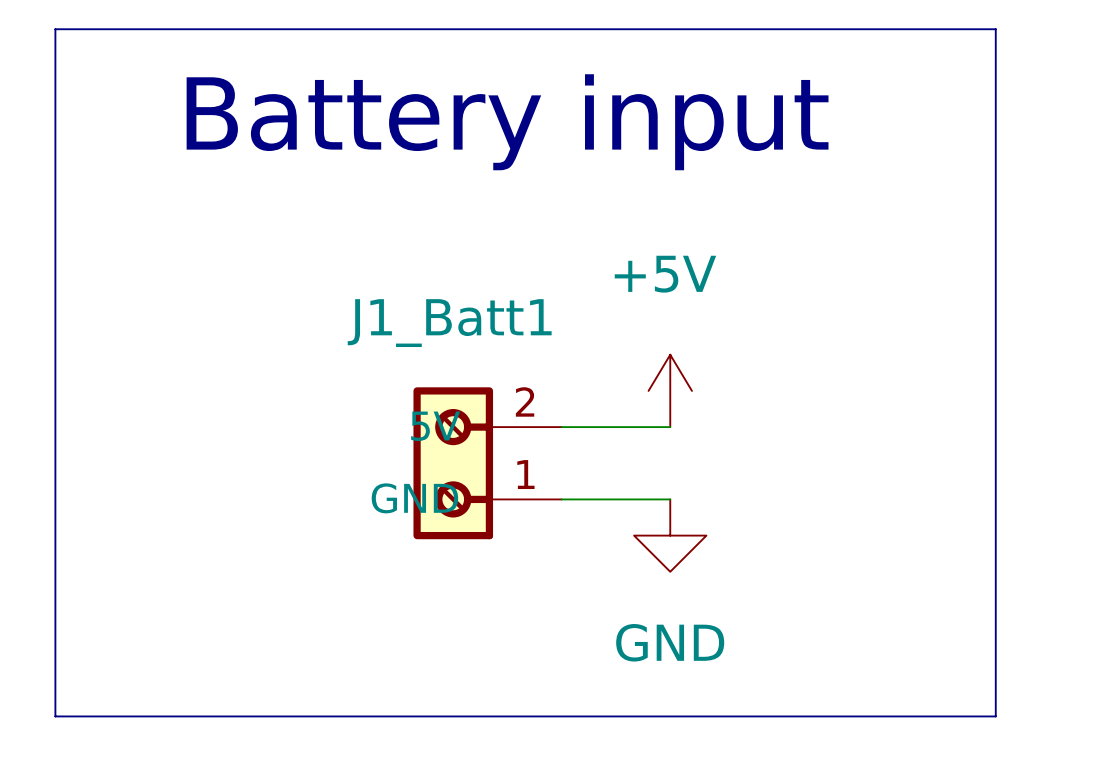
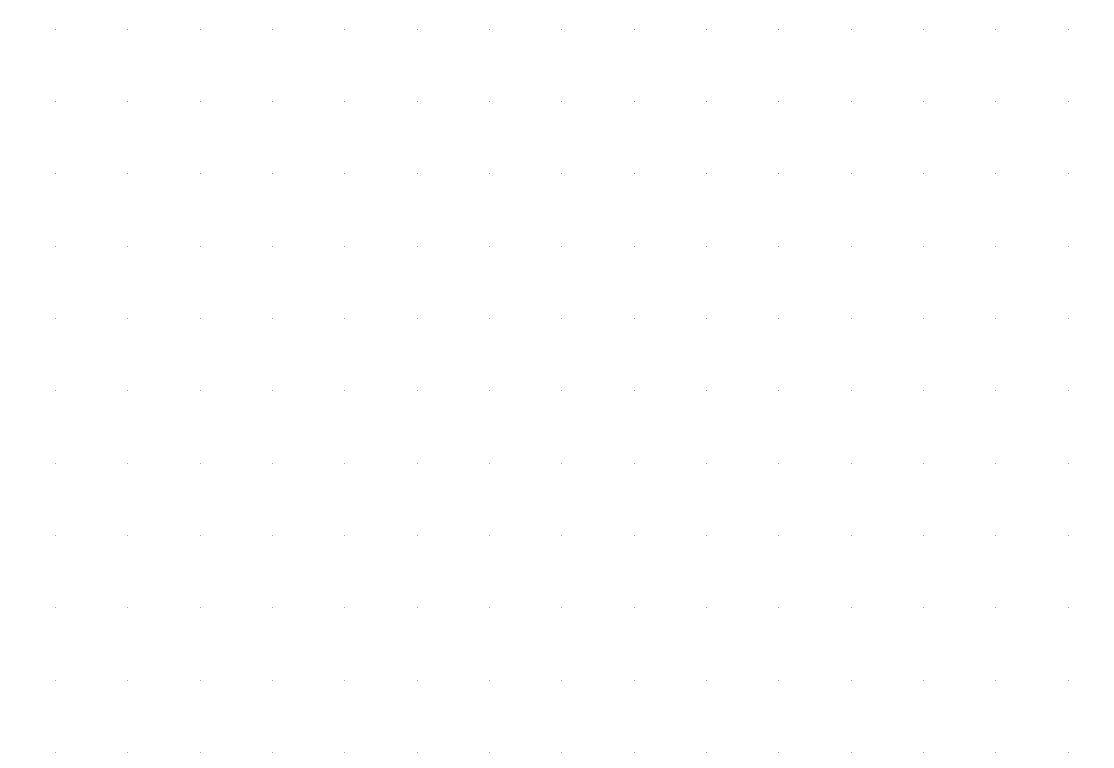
line: (55, 29) (995, 29) (995, 716) (55, 716) (55, 29) -> none
text: Battery input (507, 122) -> none
power symbol: +5V (670, 390) -> none
wire: (561, 427) (670, 427) -> none
J1_Batt1: (487, 463) -> none
wire: (561, 499) (670, 499) -> none
power symbol: GND (670, 535) -> none

